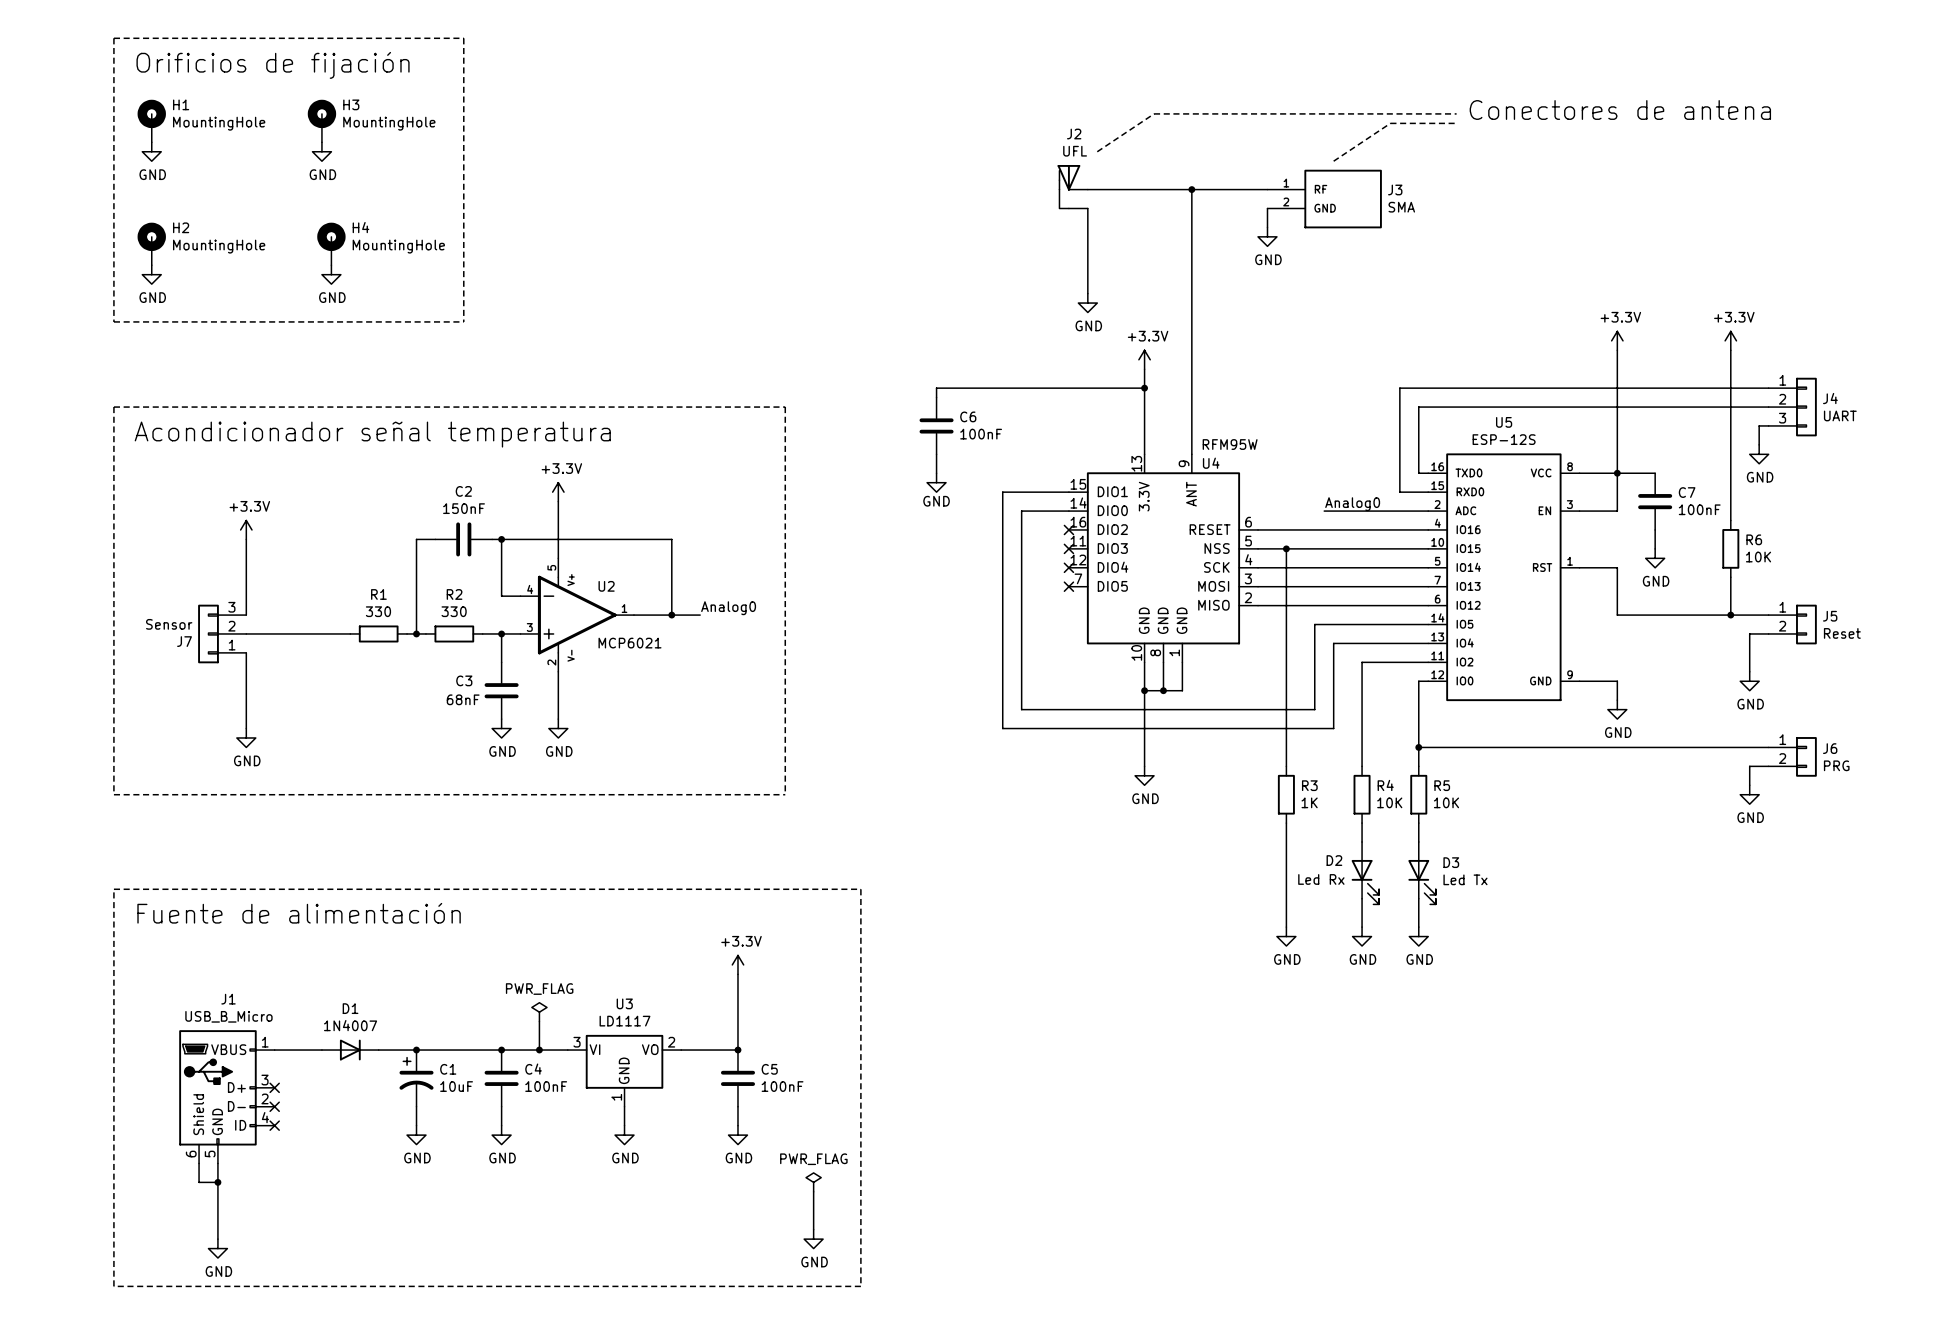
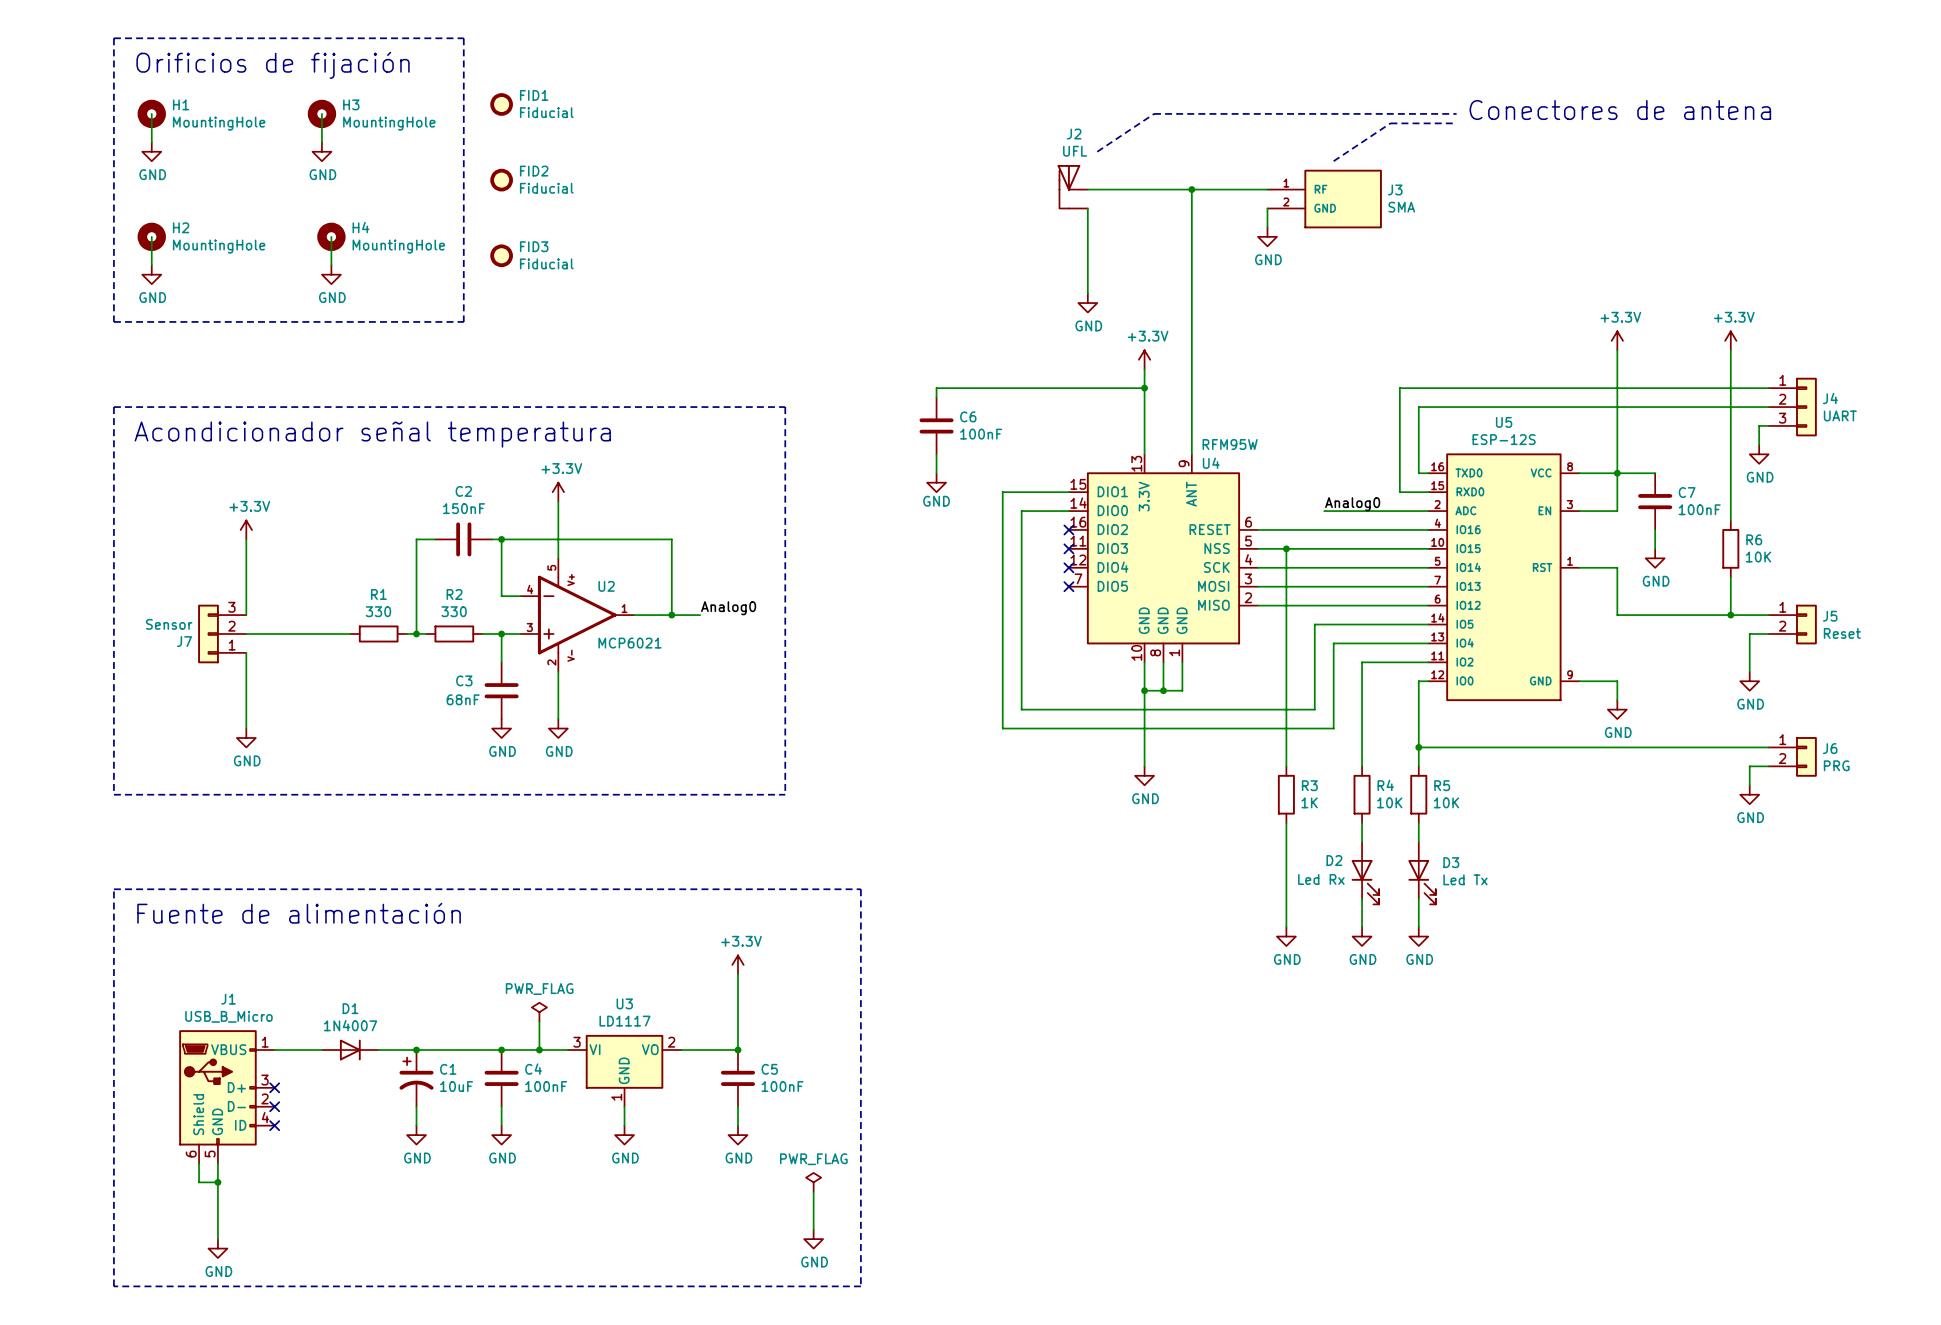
FID1: none -> Fiducial (501, 104)
FID2: none -> Fiducial (501, 180)
FID3: none -> Fiducial (501, 255)

